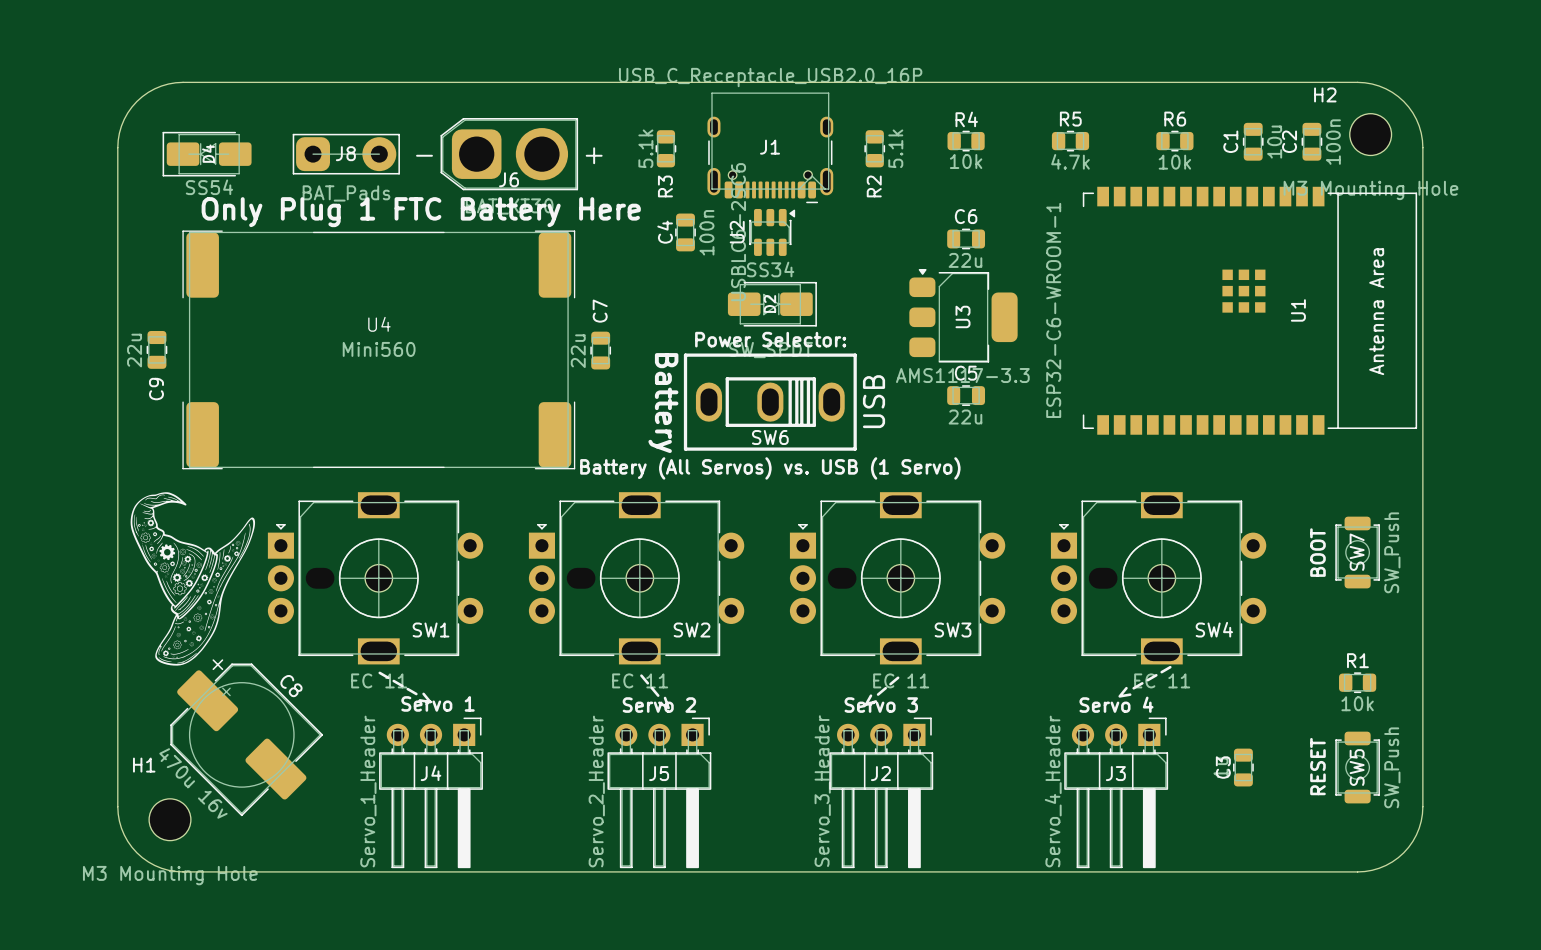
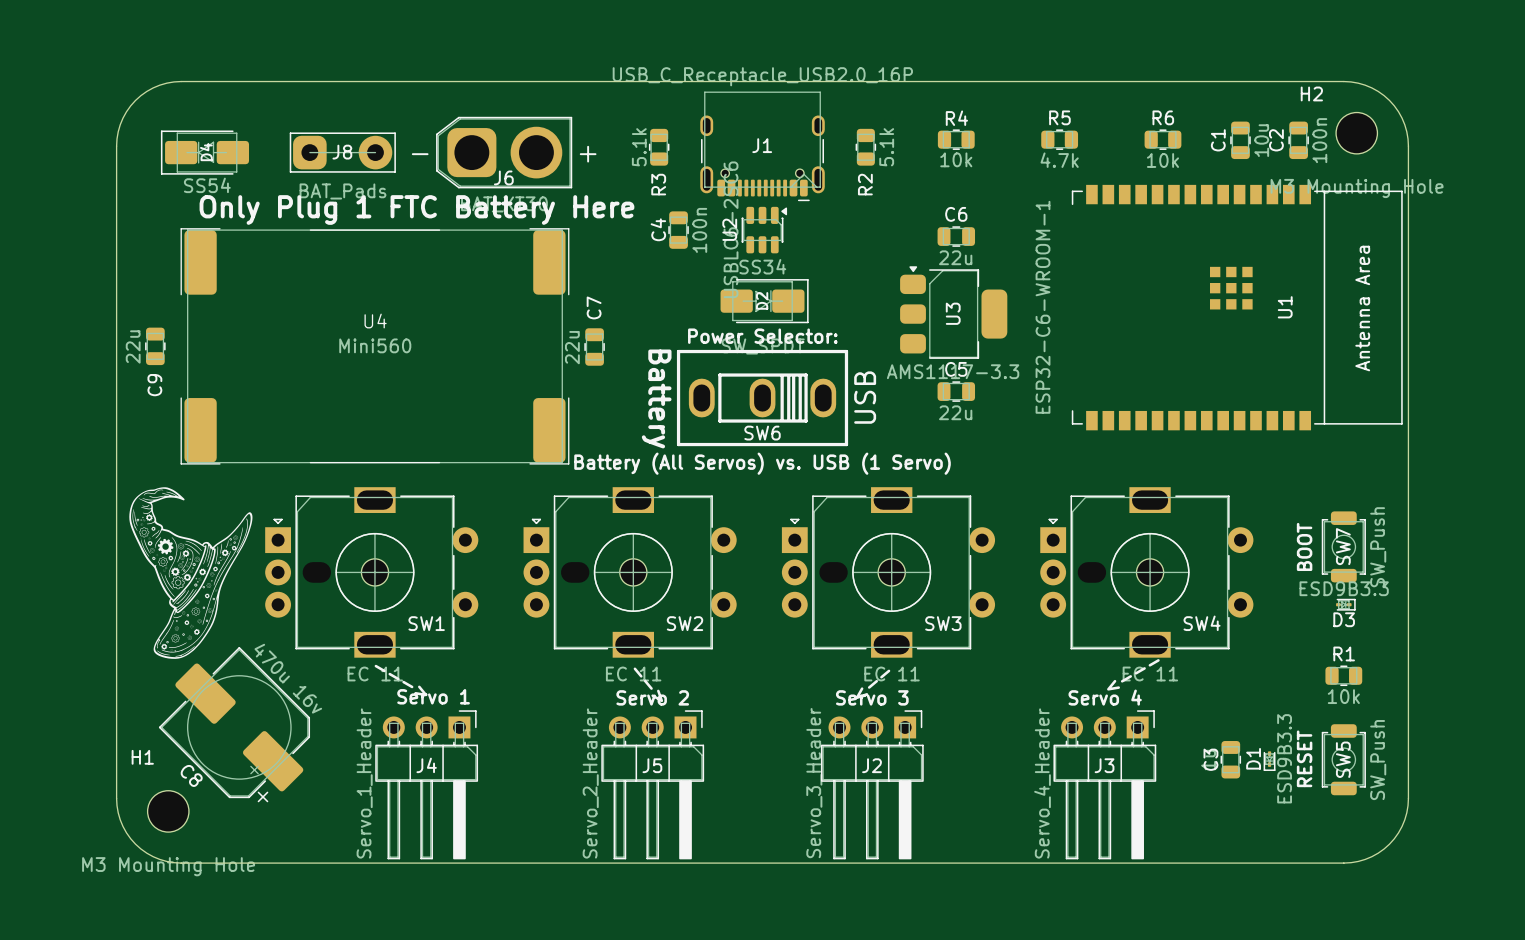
D3: none -> ESD9B3.3 (1345, 604)
C8 rotation: 0° (246, 737) -> 180° (234, 724)
D1: none -> ESD9B3.3 (1269, 761)

